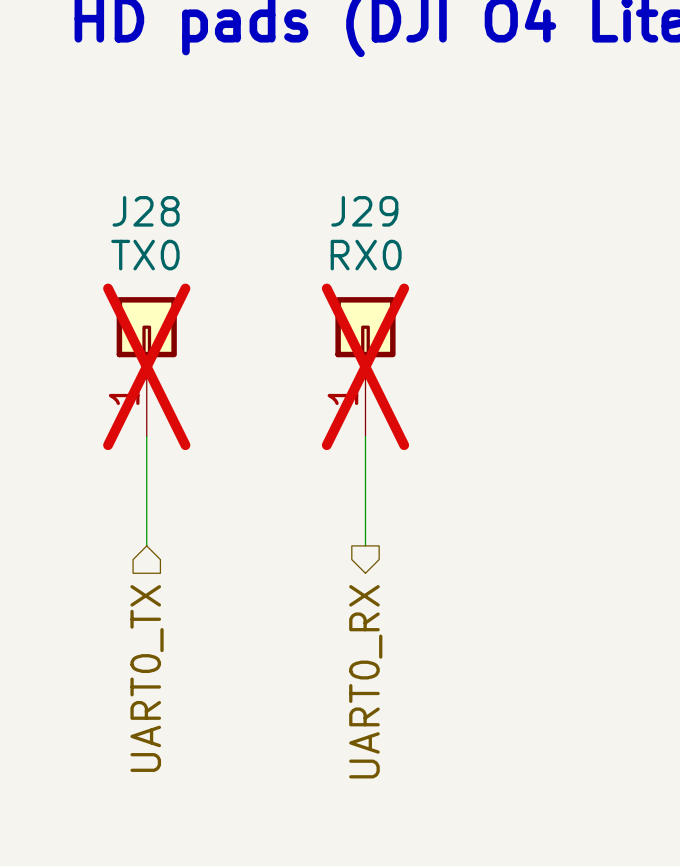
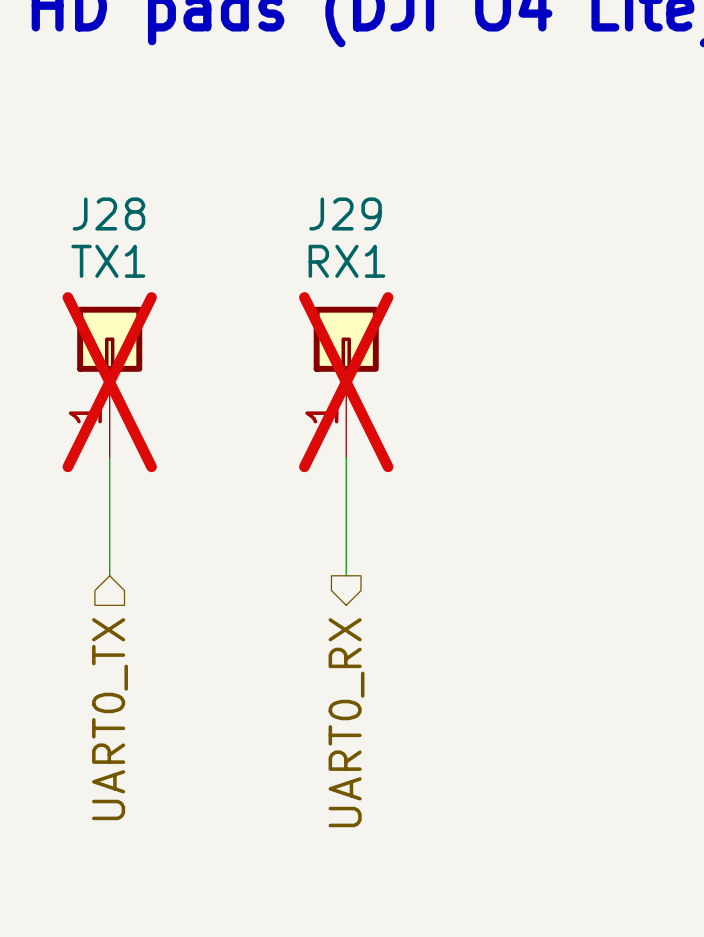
J28 value: TX0 (145, 255) -> TX1 (108, 261)
J29 value: RX0 (366, 255) -> RX1 (346, 261)

